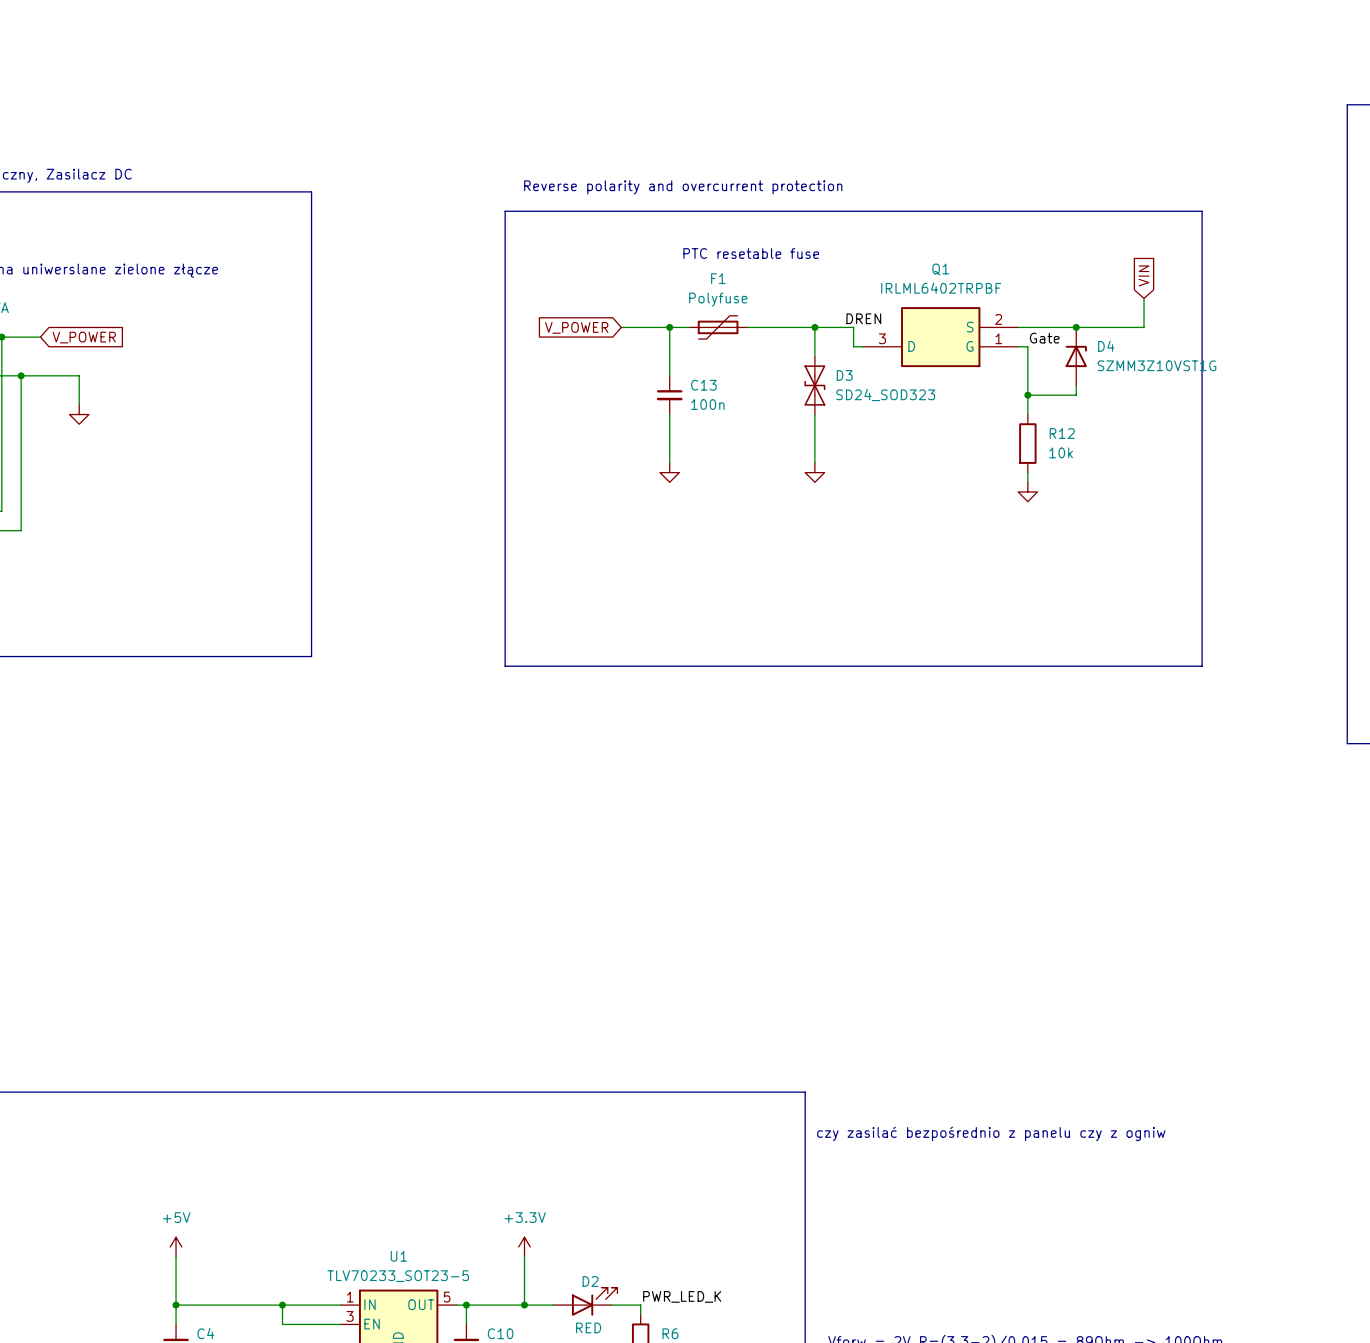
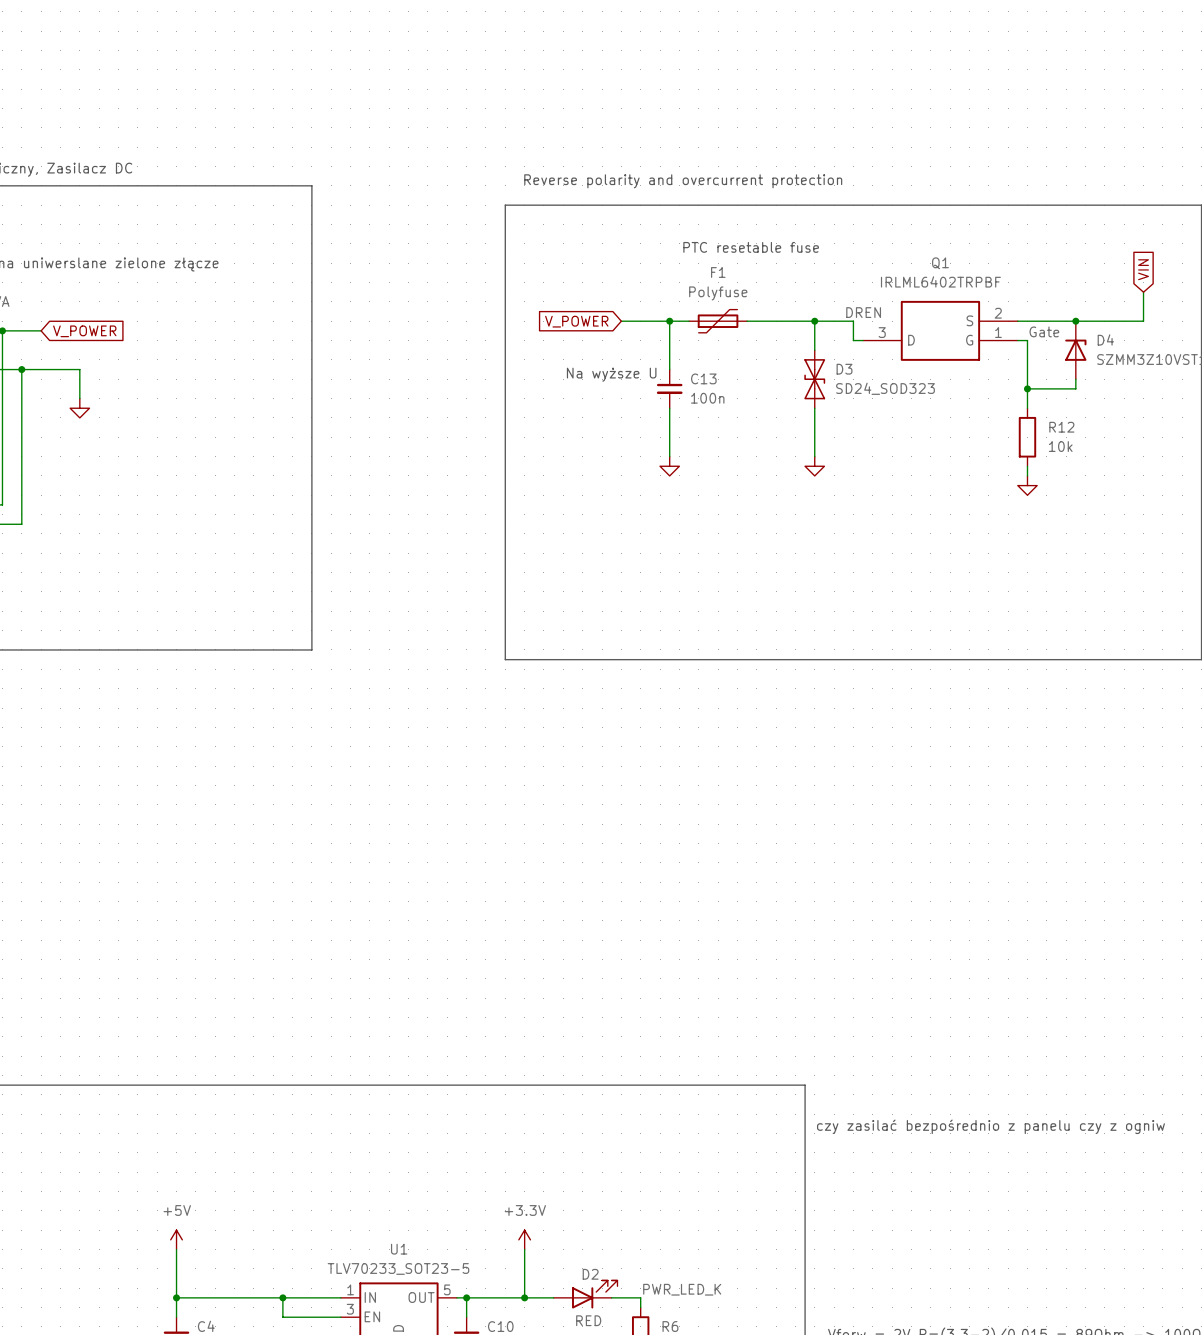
text: none -> Na wyższe U (611, 374)

